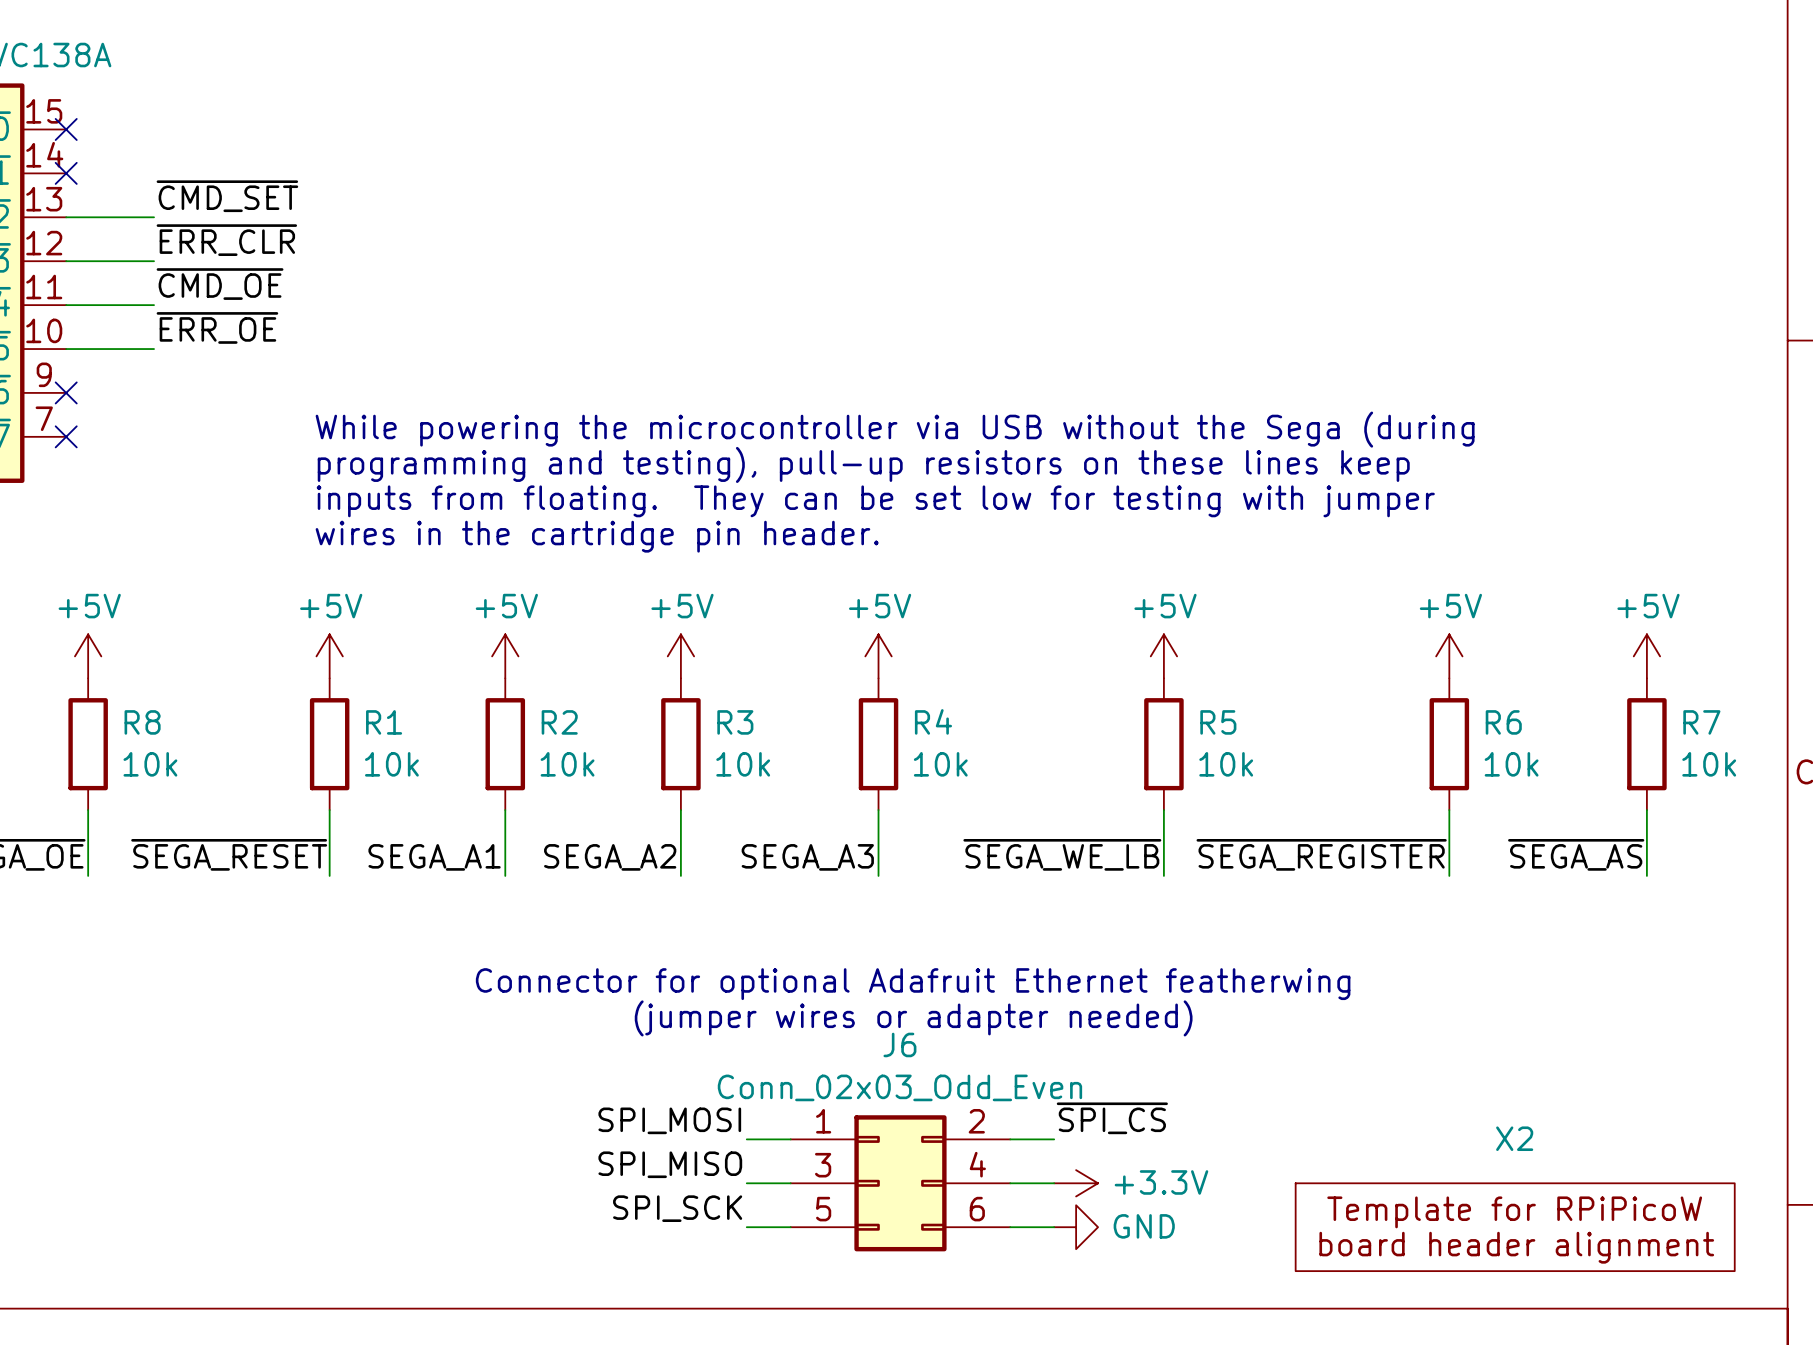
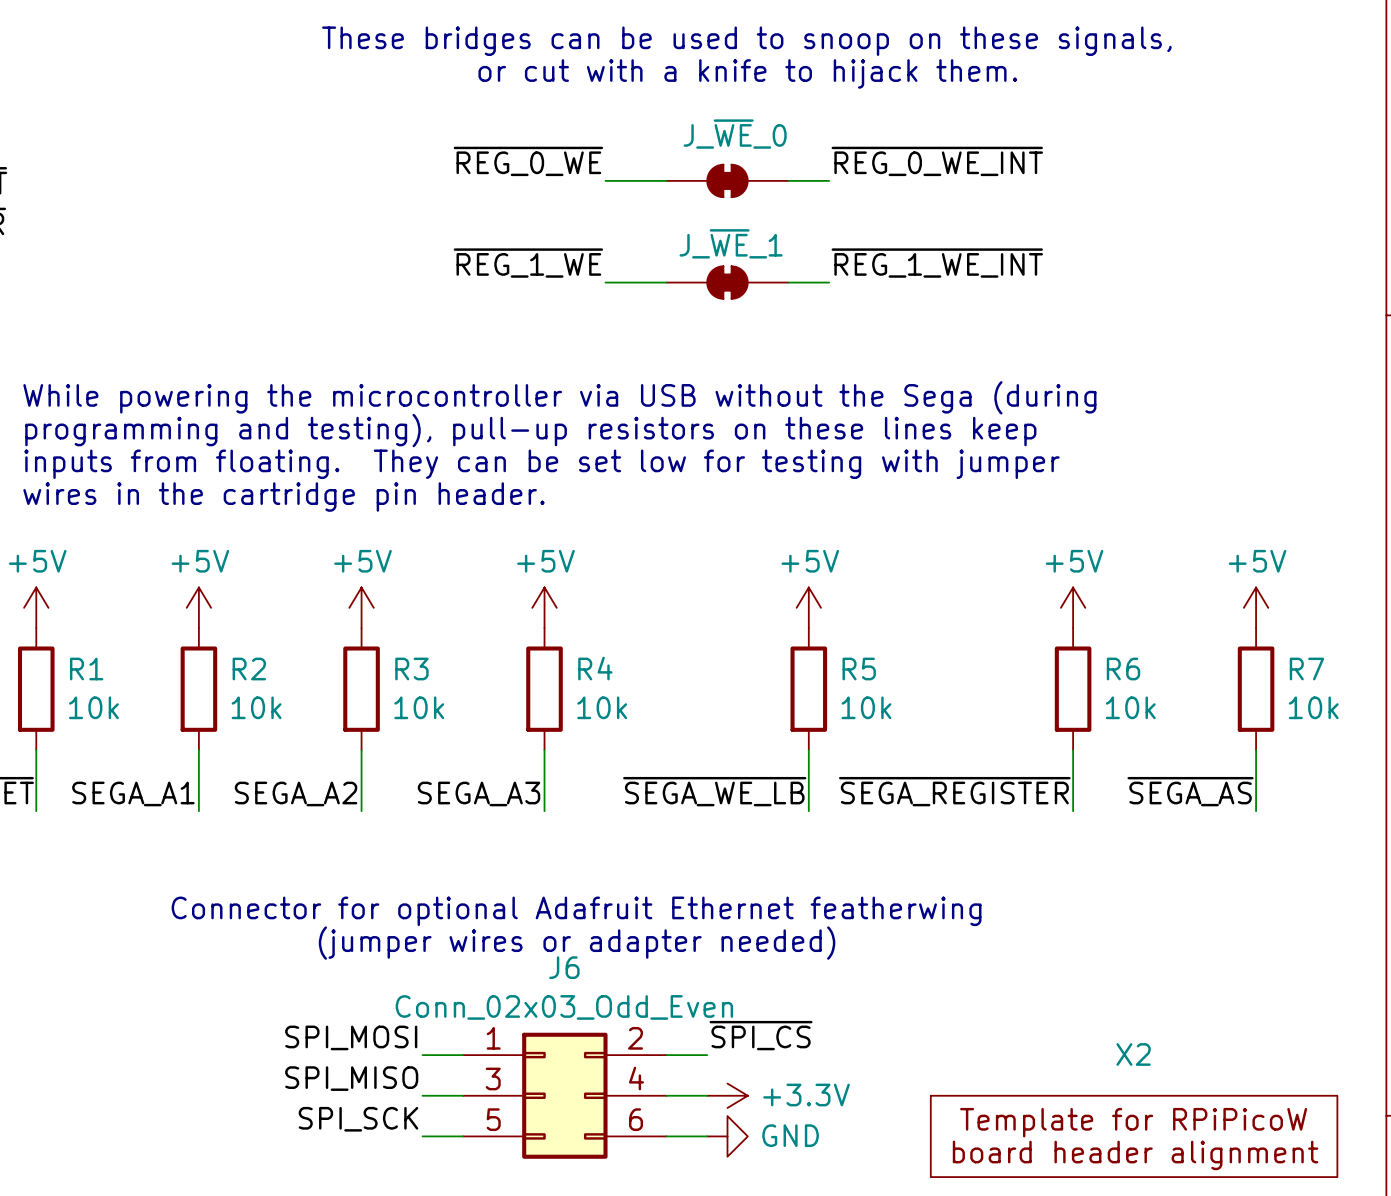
text: none -> These bridges can be used to snoop on these signals, (746, 41)
text: none -> or cut with a knife to hijack them. (747, 73)
label: none -> ~{REG_0_WE} (528, 161)
label: none -> ~{REG_0_WE_INT} (937, 161)
wire: none -> (605, 180) (666, 180)
J_~{WE}_0: none -> (727, 180)
wire: none -> (788, 180) (829, 180)
label: none -> ~{REG_1_WE} (528, 263)
label: none -> ~{REG_1_WE_INT} (937, 263)
wire: none -> (605, 282) (666, 282)
J_~{WE}_1: none -> (727, 282)
wire: none -> (788, 282) (829, 282)

